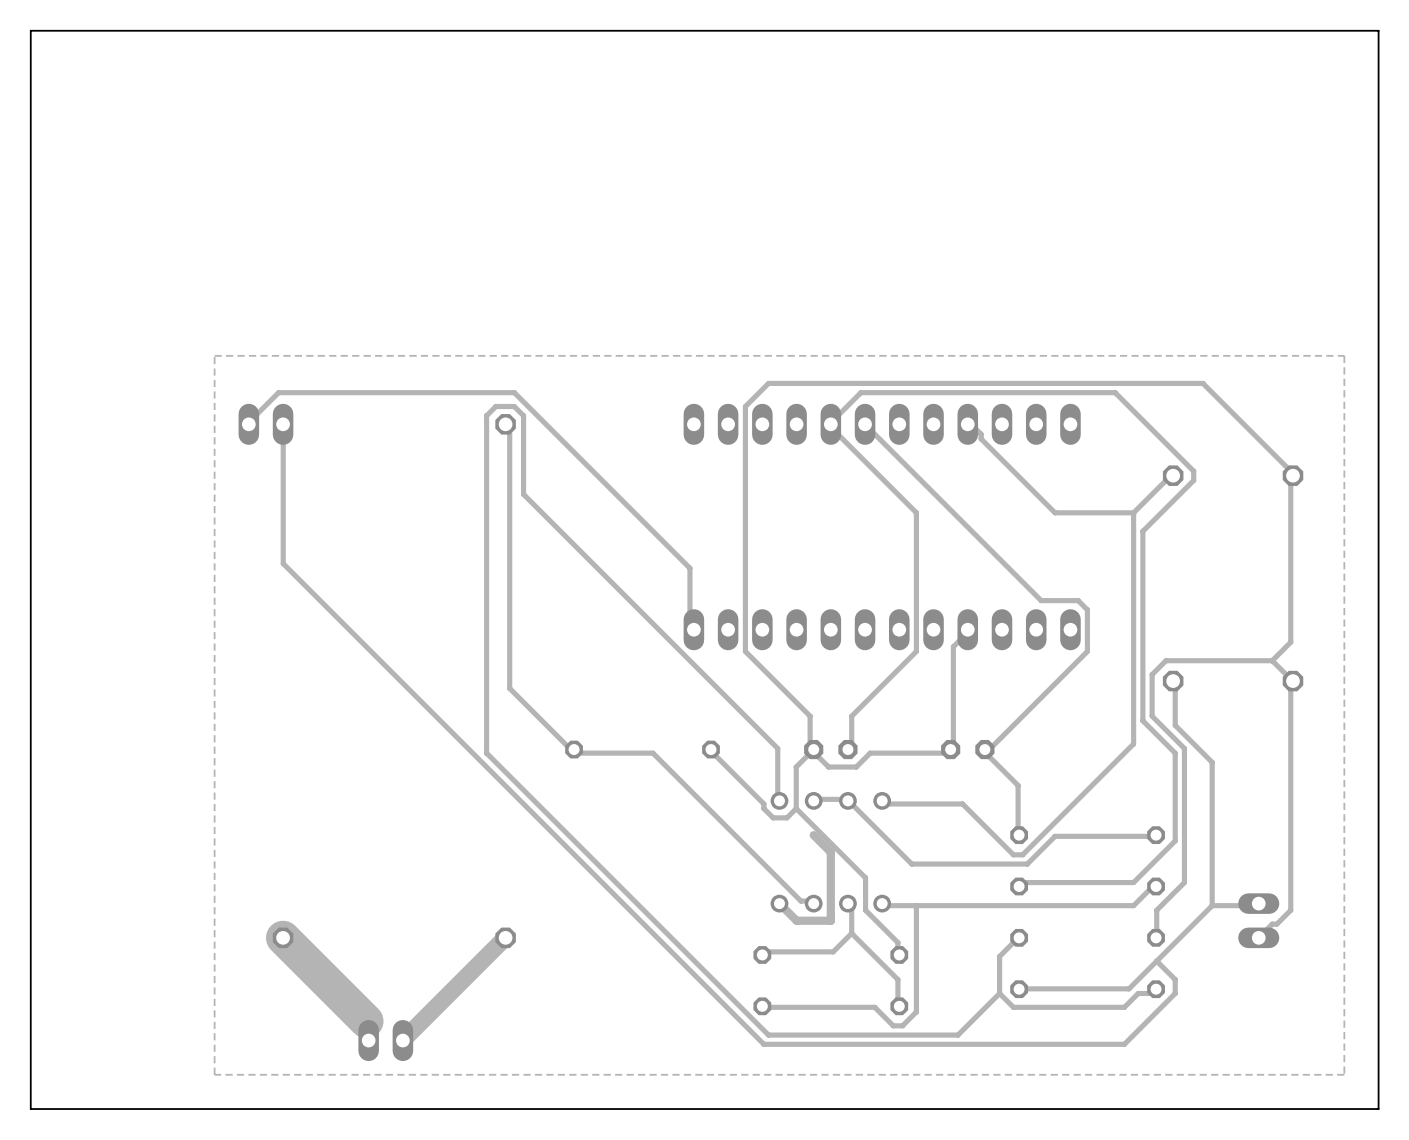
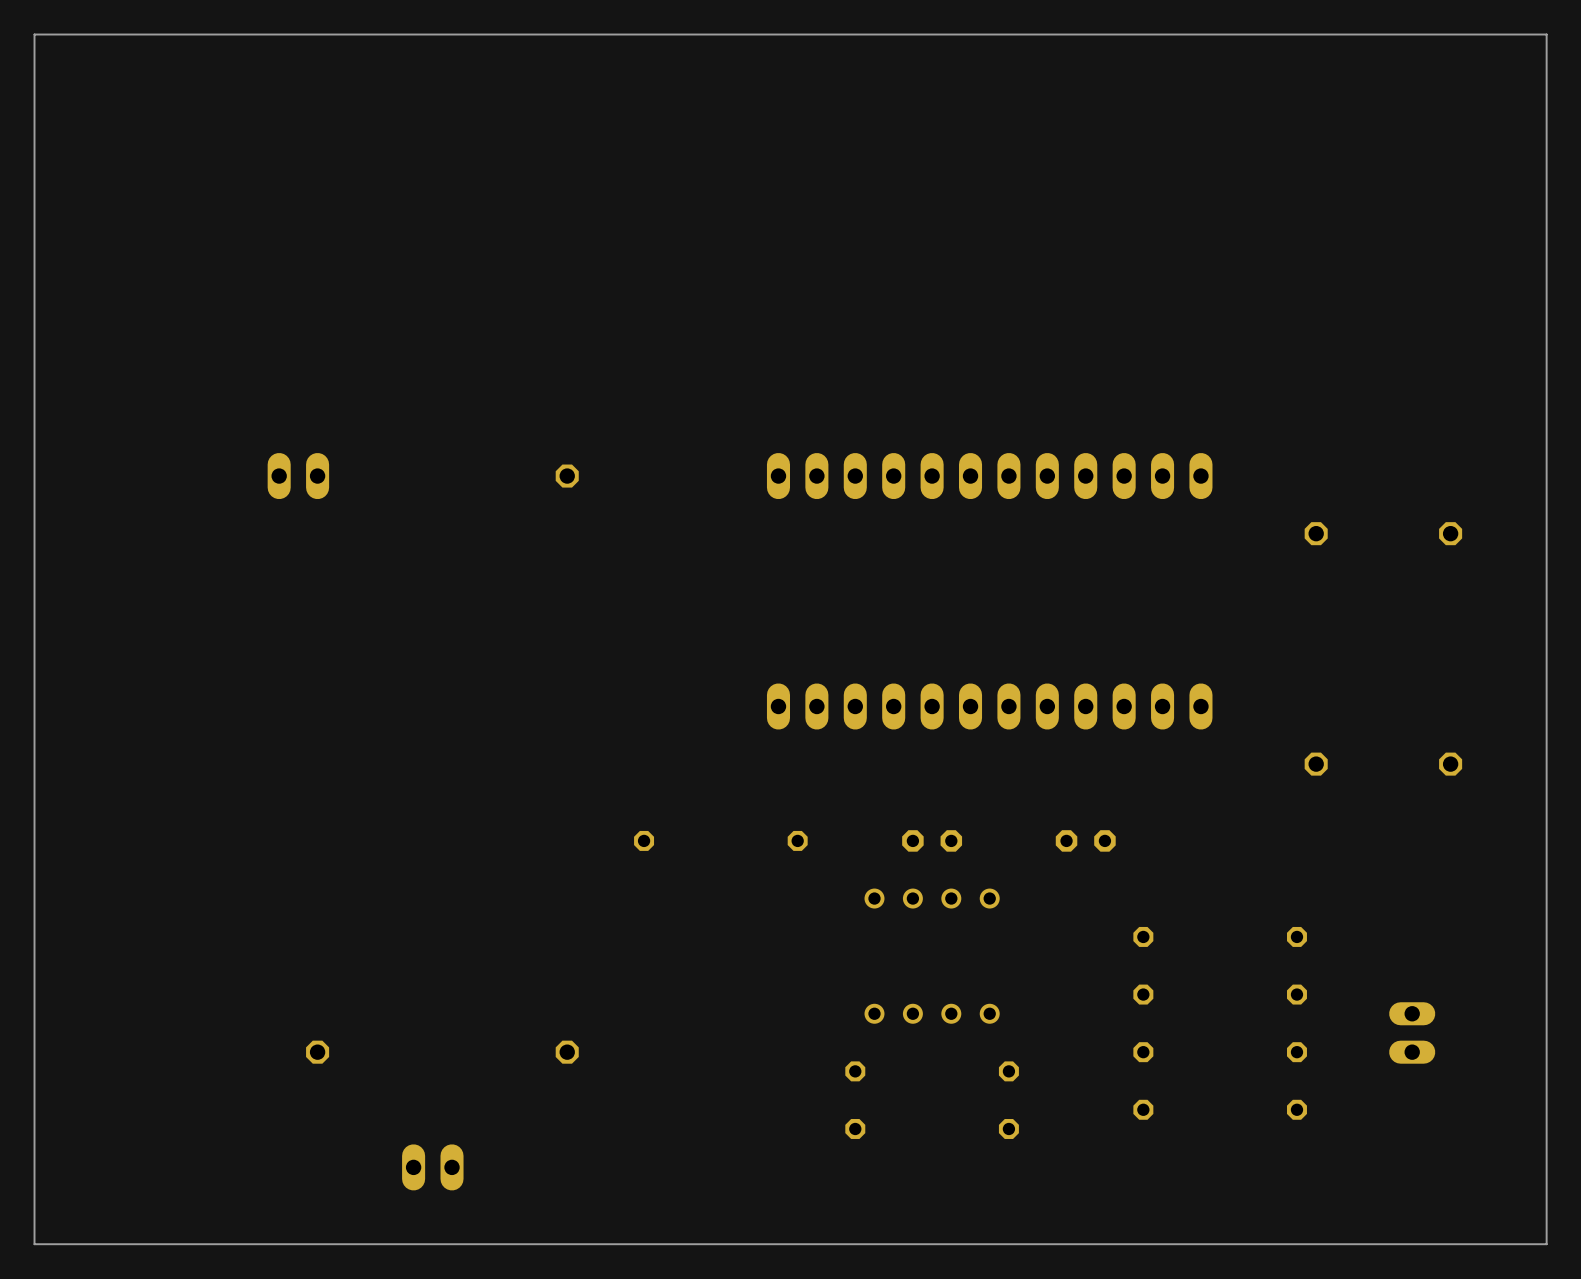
zone outline: (1344, 355) (214, 355) (214, 1074) (1344, 1074) (1344, 355) -> none
track: (248, 424) (278, 392) (514, 392) (689, 568) (689, 628) (693, 629) -> none
track: (283, 424) (283, 563) (763, 1044) (1124, 1044) (1175, 993) (1175, 979) (1156, 961) -> none
track: (505, 424) (509, 425) (509, 688) (569, 748) (574, 749) (574, 753) (652, 753) (800, 901) (810, 901) (813, 903) -> none
track: (865, 424) (1041, 600) (1078, 600) (1087, 609) (1087, 651) (985, 753) -> none
track: (967, 424) (971, 425) (981, 434) (981, 438) (1055, 512) (1133, 512) -> none
track: (1173, 475) (1170, 475) (1133, 512) -> none
track: (1133, 512) (1133, 743) (1022, 854) (1013, 854) (962, 803) (884, 803) (882, 800) -> none
track: (967, 629) (967, 632) (953, 646) (953, 748) (948, 753) (870, 753) (856, 767) (828, 767) (814, 753) (813, 749) -> none
track: (1272, 660) (1165, 660) (1152, 674) (1152, 716) (1184, 748) (1184, 882) (1156, 910) (1156, 937) -> none
track: (1272, 660) (1292, 681) (1290, 683) (1290, 910) (1276, 924) (1272, 924) (1258, 937) -> none
track: (1272, 660) (1290, 642) (1290, 475) (1292, 475) (1290, 471) (1202, 383) (768, 383) (745, 406) (745, 651) (810, 716) (810, 748) (813, 749) -> none
track: (1173, 681) (1175, 683) (1175, 725) (1212, 762) (1212, 905) -> none
track: (711, 749) (763, 803) (763, 808) (773, 817) (787, 817) (796, 808) -> none
track: (813, 749) (796, 767) (796, 808) -> none
track: (847, 749) (851, 748) (851, 716) (916, 651) (916, 512) (828, 425) (860, 392) (1115, 392) (1193, 471) (1193, 480) (1142, 531) (1142, 720) (1175, 753) (1175, 840) (1133, 882) (1022, 882) (1019, 886) -> none
track: (985, 753) (1018, 785) (1019, 835) -> none
track: (779, 800) (777, 799) (777, 748) (523, 494) (523, 415) (514, 406) (495, 406) (486, 415) (486, 753) (768, 1035) (958, 1035) (999, 993) -> none
track: (813, 800) (847, 799) (911, 864) (1027, 864) (1055, 836) (1156, 835) -> none
track: (796, 808) (865, 877) (865, 910) (897, 942) (899, 954) -> none
track: (813, 835) (830, 852) (830, 920) (796, 920) (779, 903) -> none
track: (1156, 886) (1152, 887) (1133, 905) (884, 905) (882, 903) -> none
track: (847, 903) (851, 905) (851, 933) -> none
track: (1258, 903) (1258, 905) (1212, 905) -> none
track: (916, 905) (916, 1011) (902, 1025) (893, 1025) (874, 1007) (762, 1006) -> none
track: (1212, 905) (1129, 988) (1019, 989) -> none
track: (851, 933) (897, 979) (899, 1006) -> none
track: (851, 933) (833, 951) (763, 951) (762, 954) -> none
track: (283, 937) (366, 1021) -> none
track: (505, 937) (402, 1040) -> none
track: (1019, 937) (999, 956) (999, 993) -> none
track: (1156, 989) (1152, 993) (1138, 993) (1124, 1007) (1013, 1007) (999, 993) -> none

